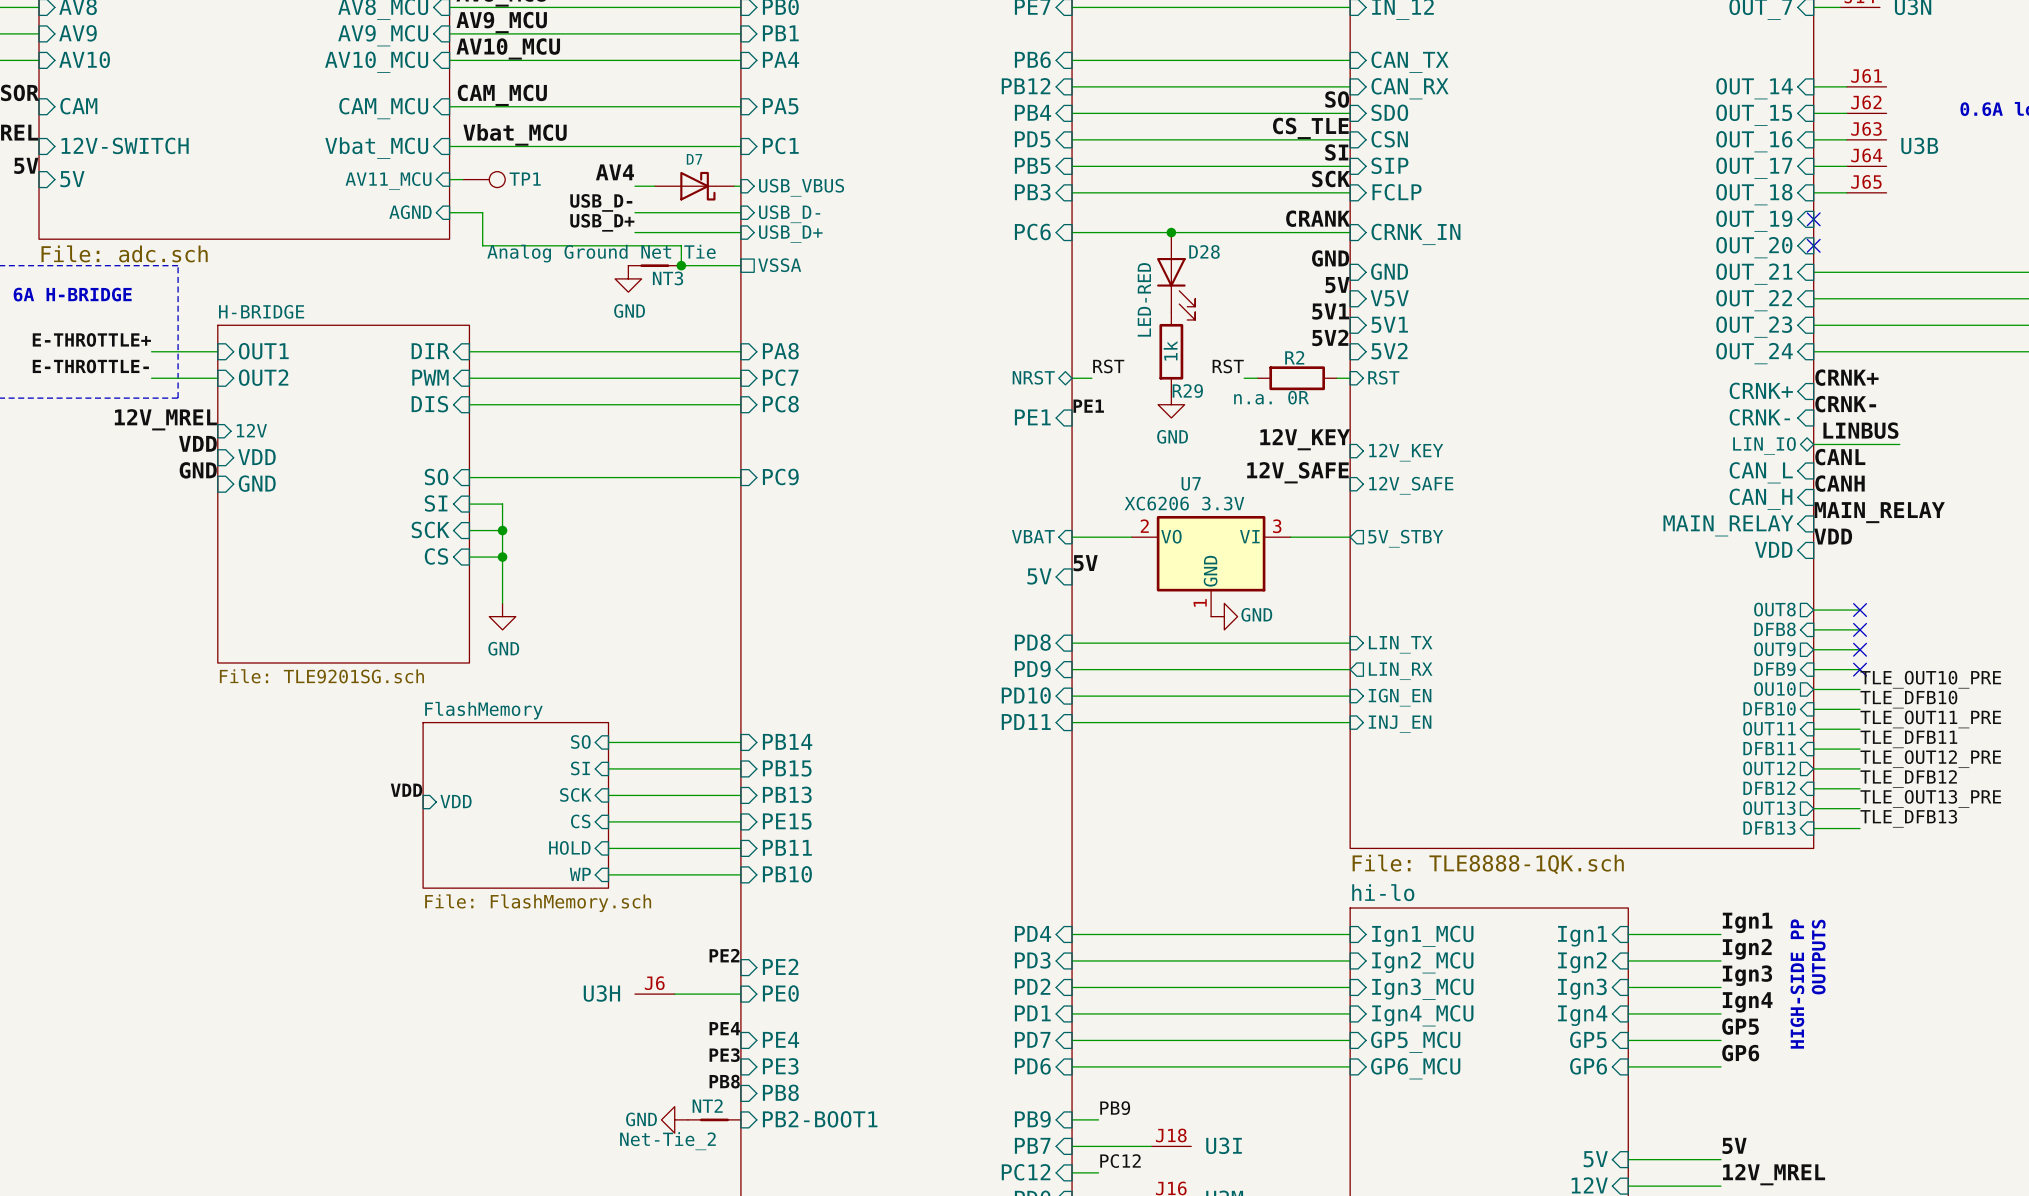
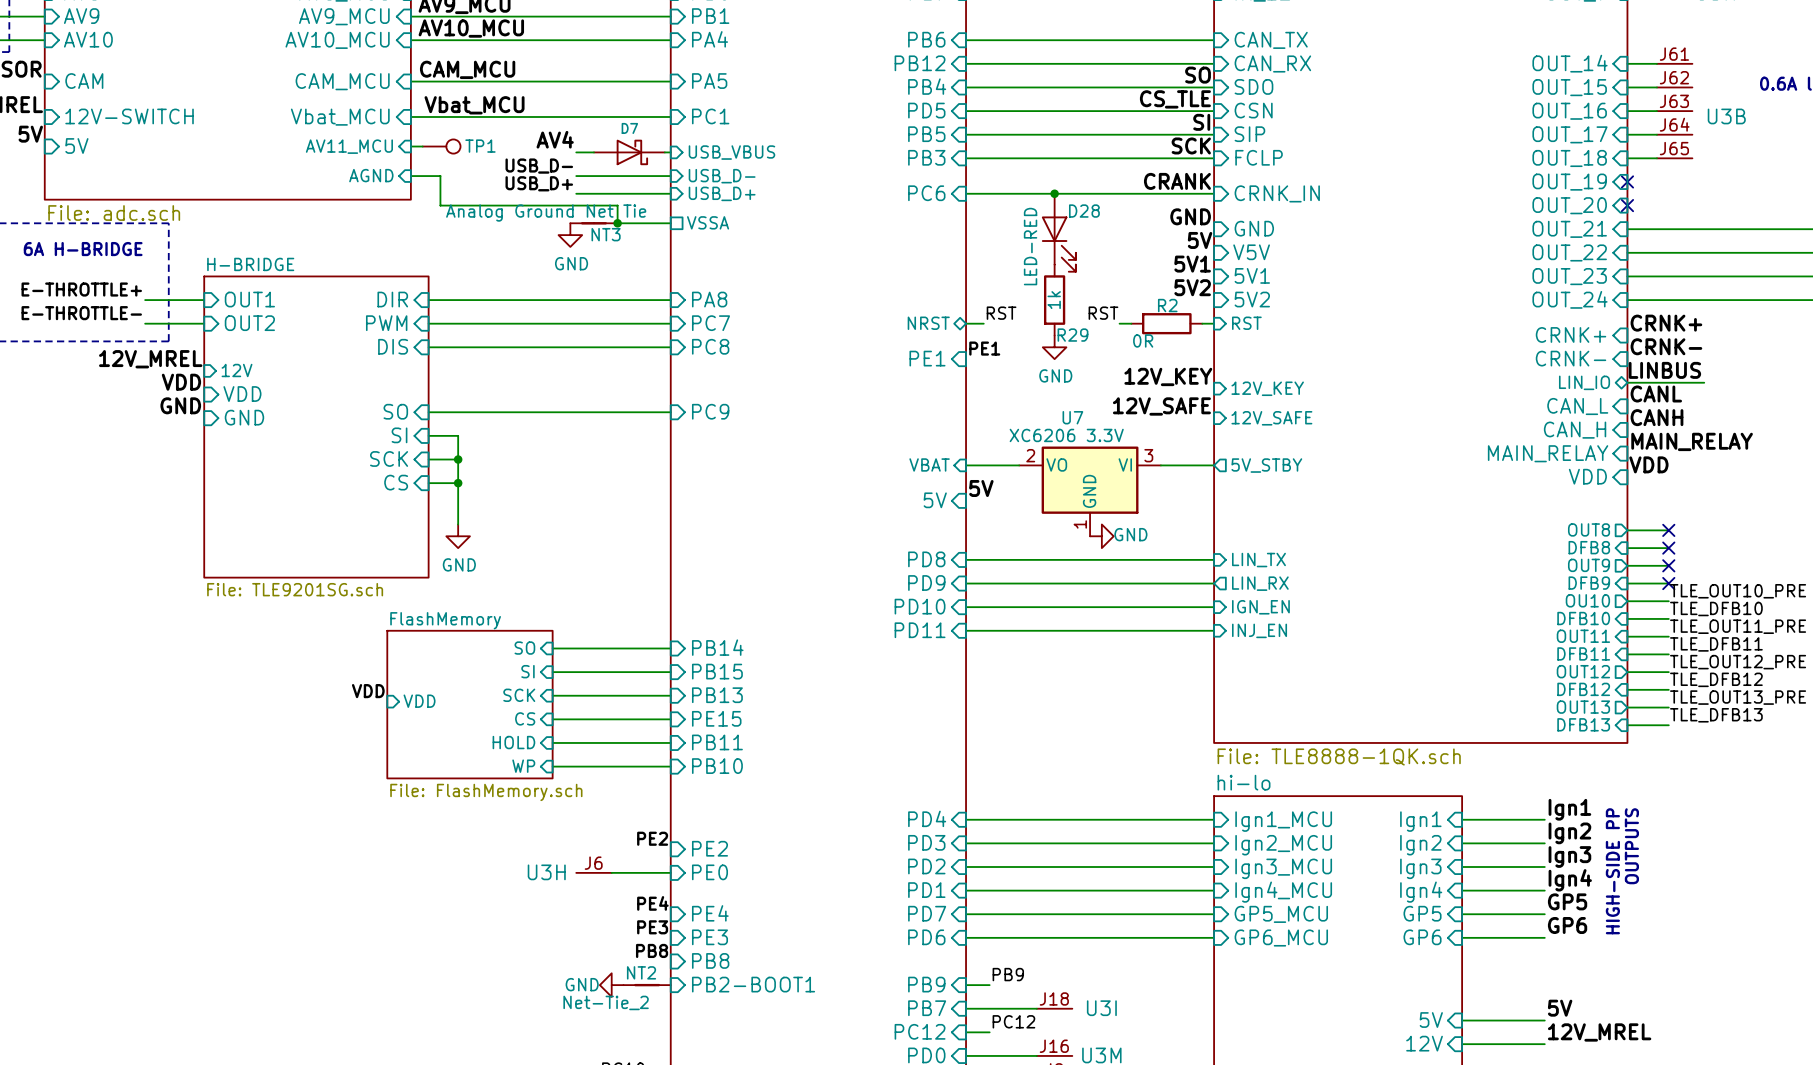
R2 value: n.a. 0R (1271, 397) -> 0R (1143, 340)

